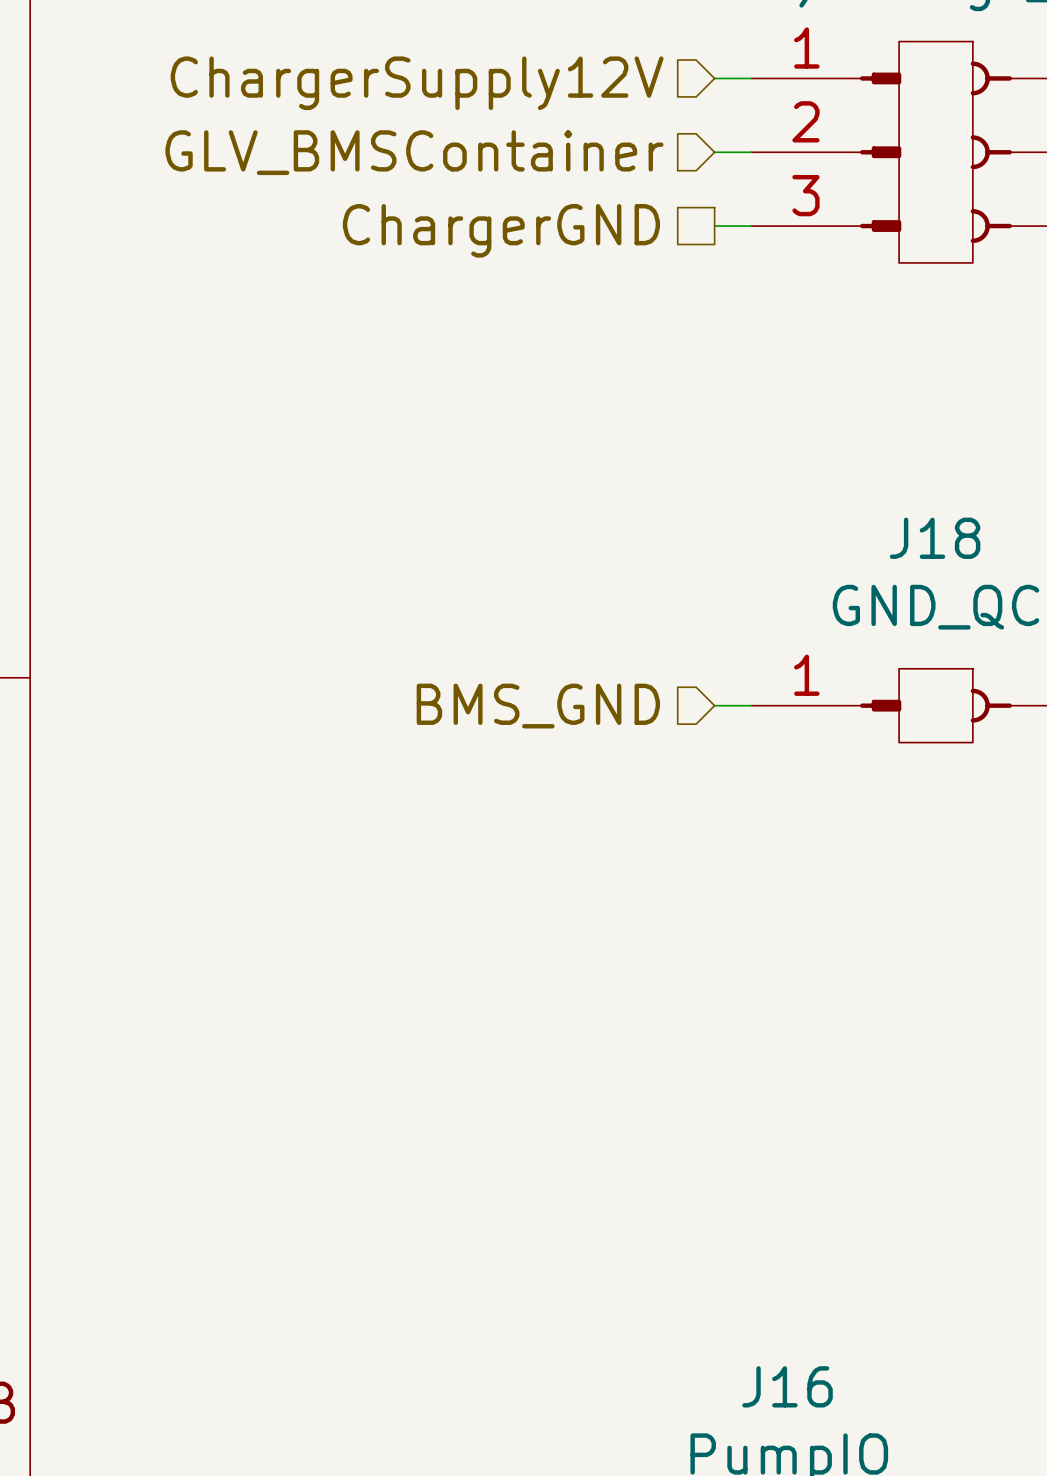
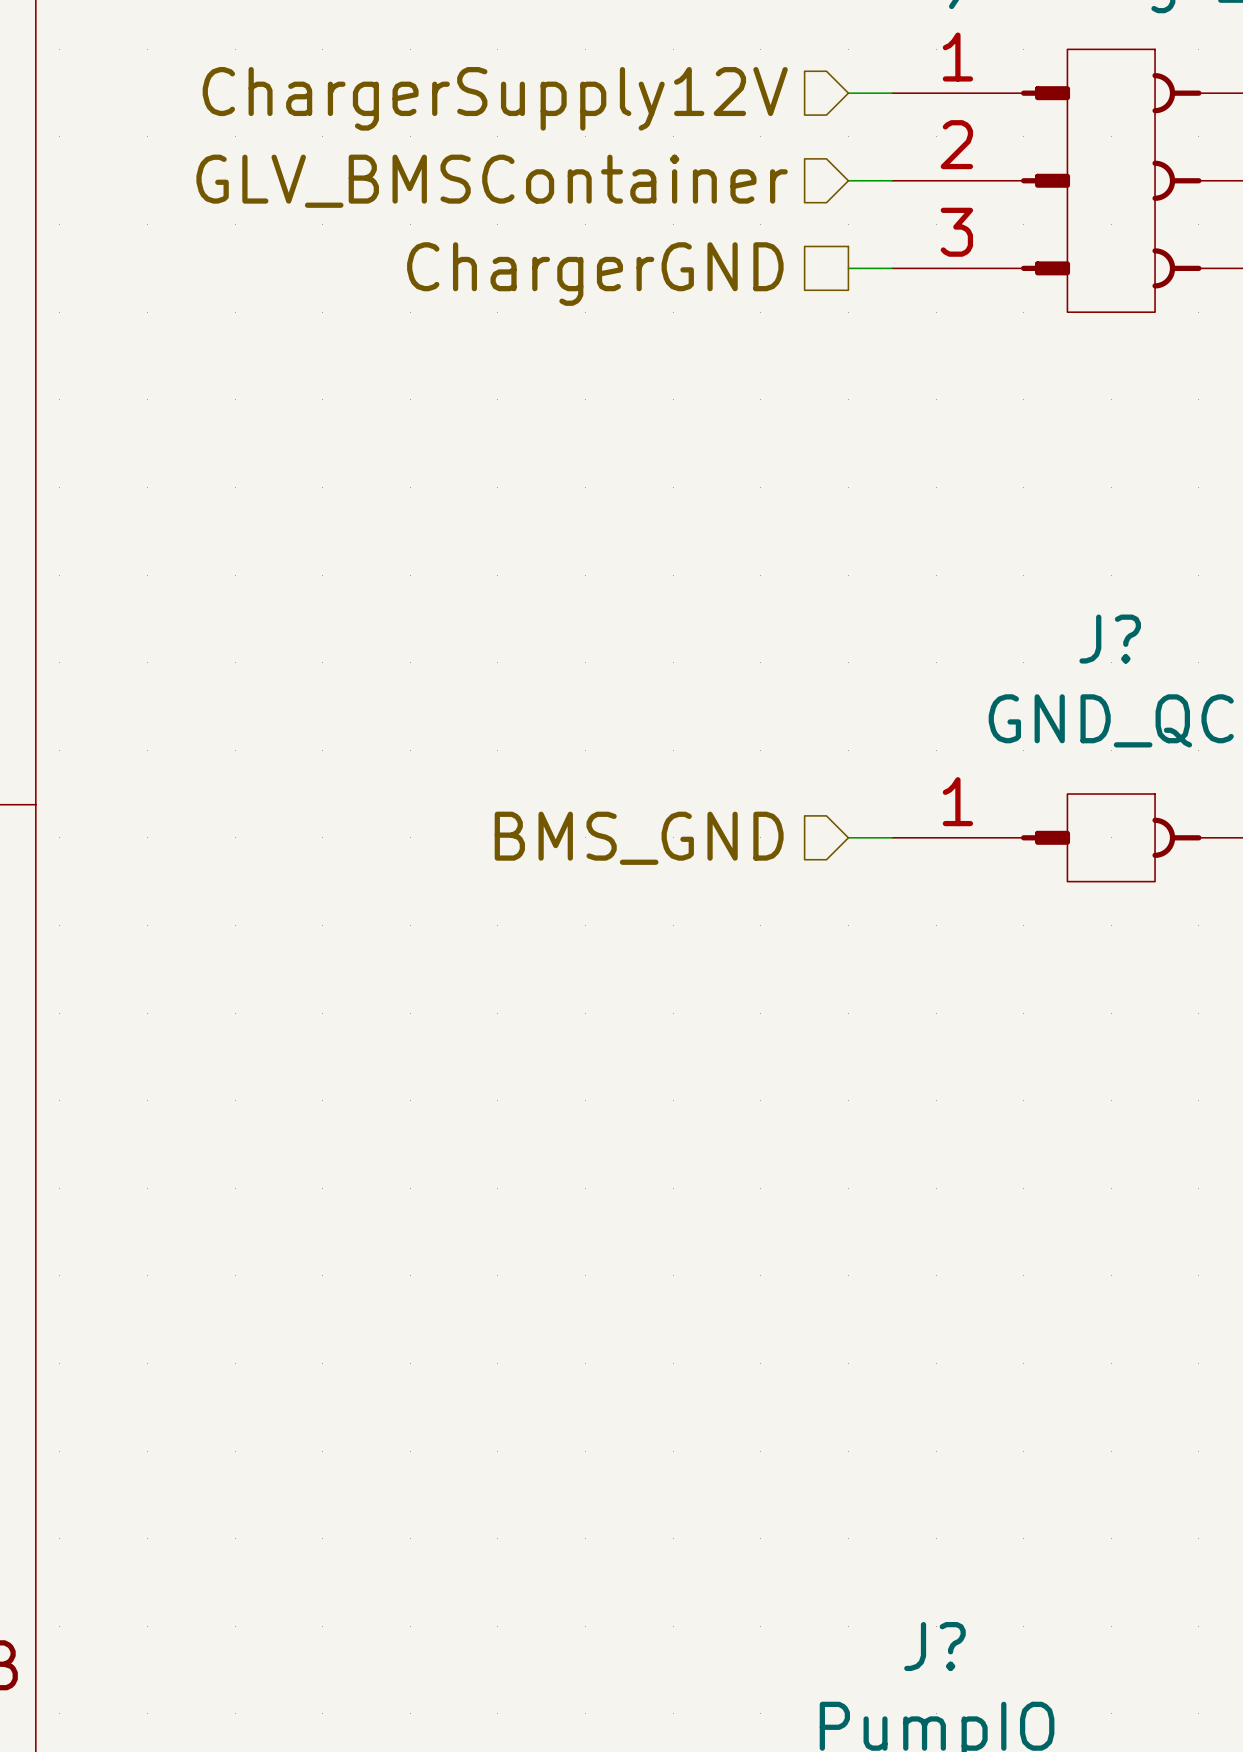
J18 name: J18 (935, 538) -> J? (1110, 639)
J16 name: J16 (787, 1386) -> J? (934, 1646)

